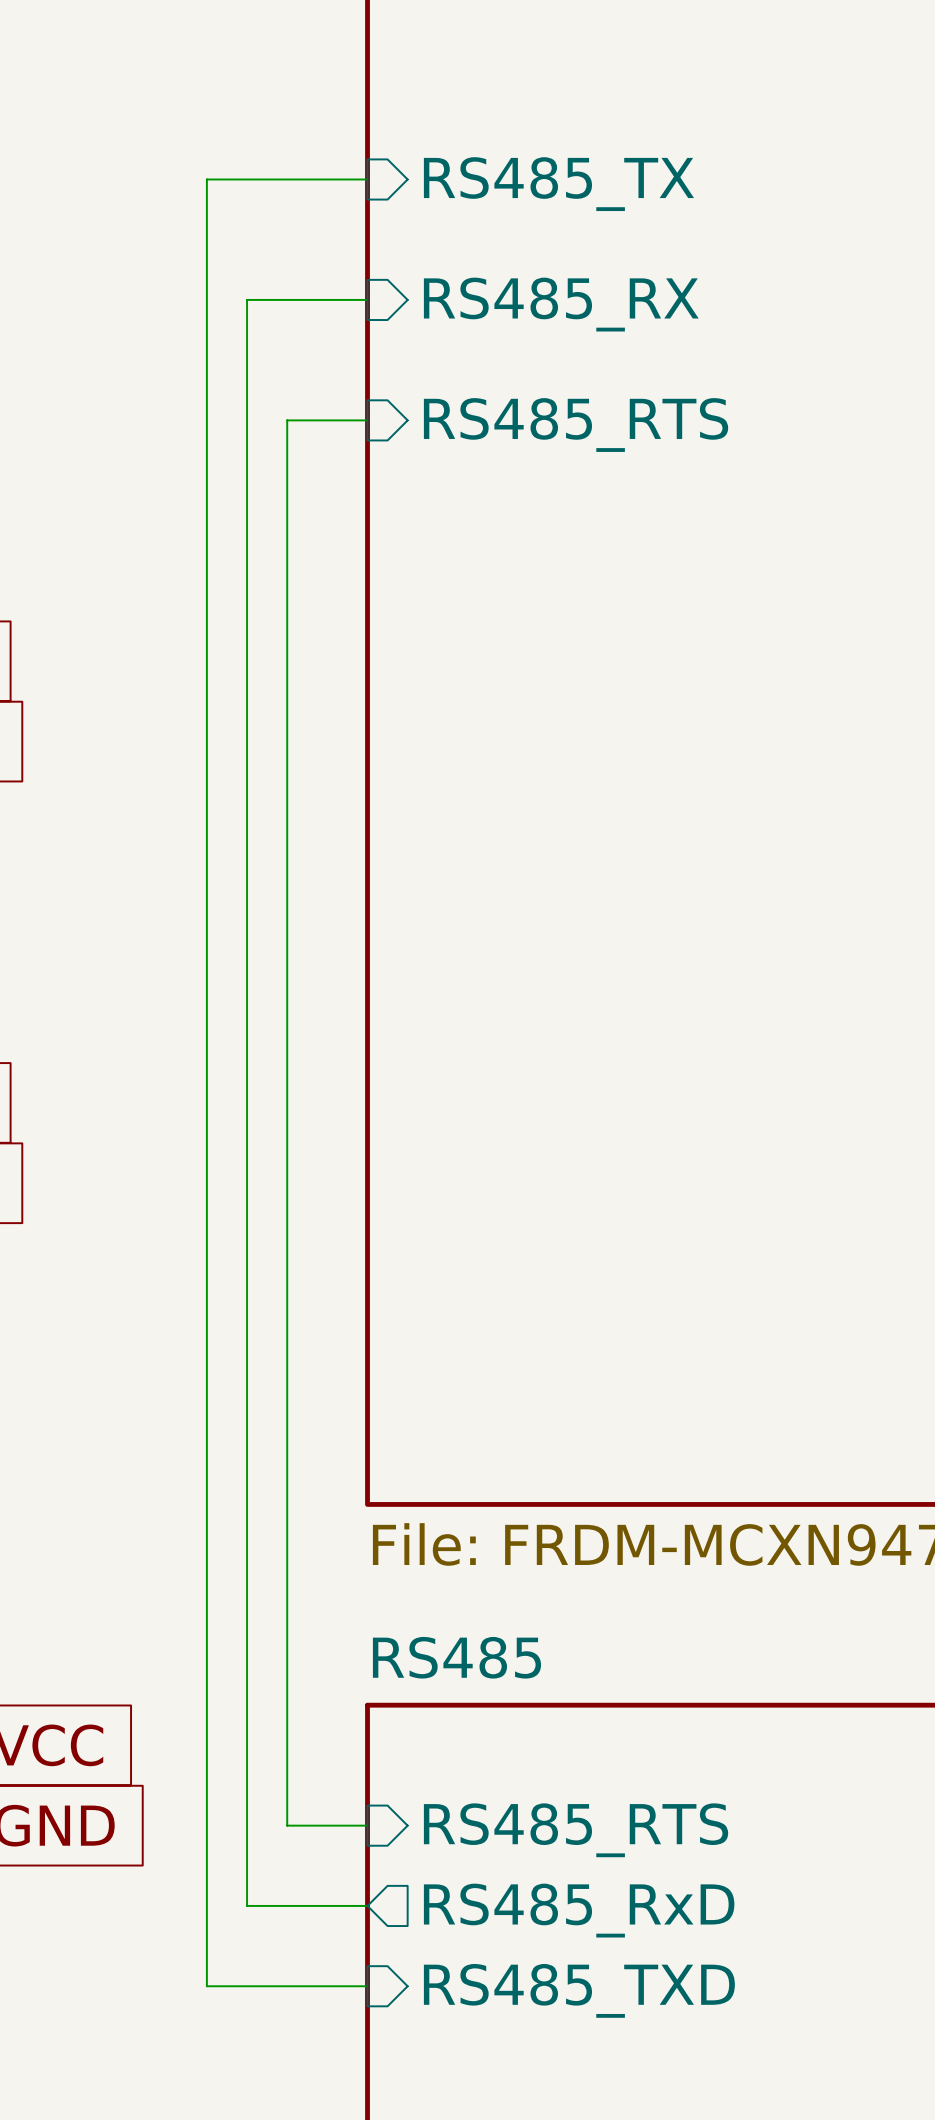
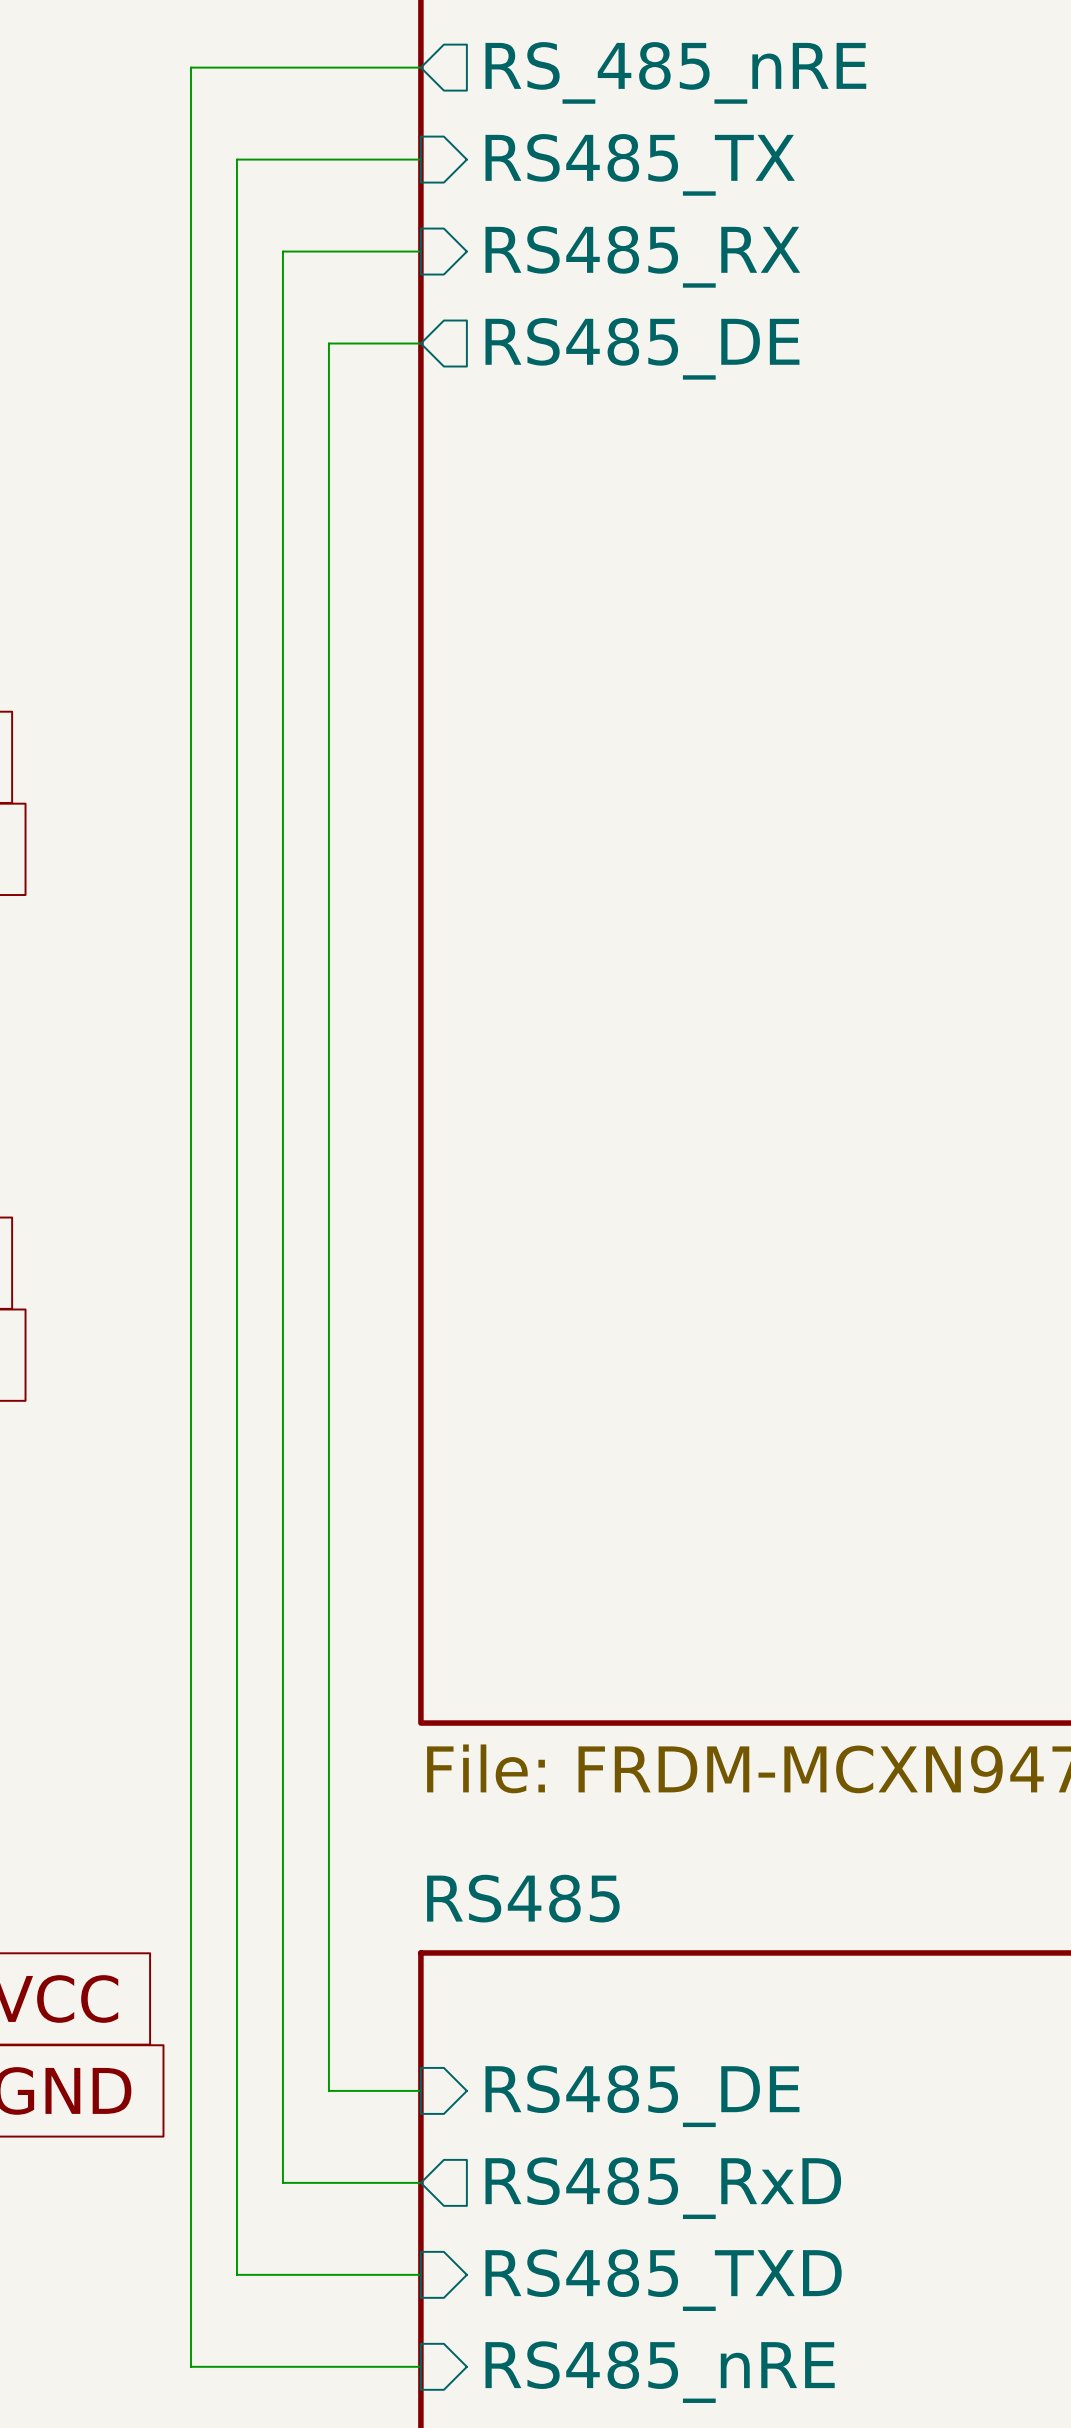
wire: none -> (420, 67) (190, 67) (190, 2366) (420, 2366)
sheet pin: none -> RS_485_nRE (675, 72)
wire: (206, 179) (367, 179) -> (236, 205) (236, 159) (420, 159)
sheet pin position: RS485_TX (558, 184) -> RS485_TX (640, 164)
sheet pin: none -> RS485_RX (642, 256)
wire: (247, 299) (287, 299) -> (282, 343) (282, 251) (420, 251)
sheet pin shape: input (561, 304) -> output (642, 348)
sheet pin: RS485_RX (561, 304) -> RS485_DE (642, 348)
wire: (287, 420) (367, 420) -> (328, 481) (328, 343)
sheet pin: RS485_RTS (576, 425) -> none
sheet pin: RS485_RTS (576, 1830) -> RS485_DE (642, 2096)
sheet pin: none -> RS485_nRE (660, 2372)

